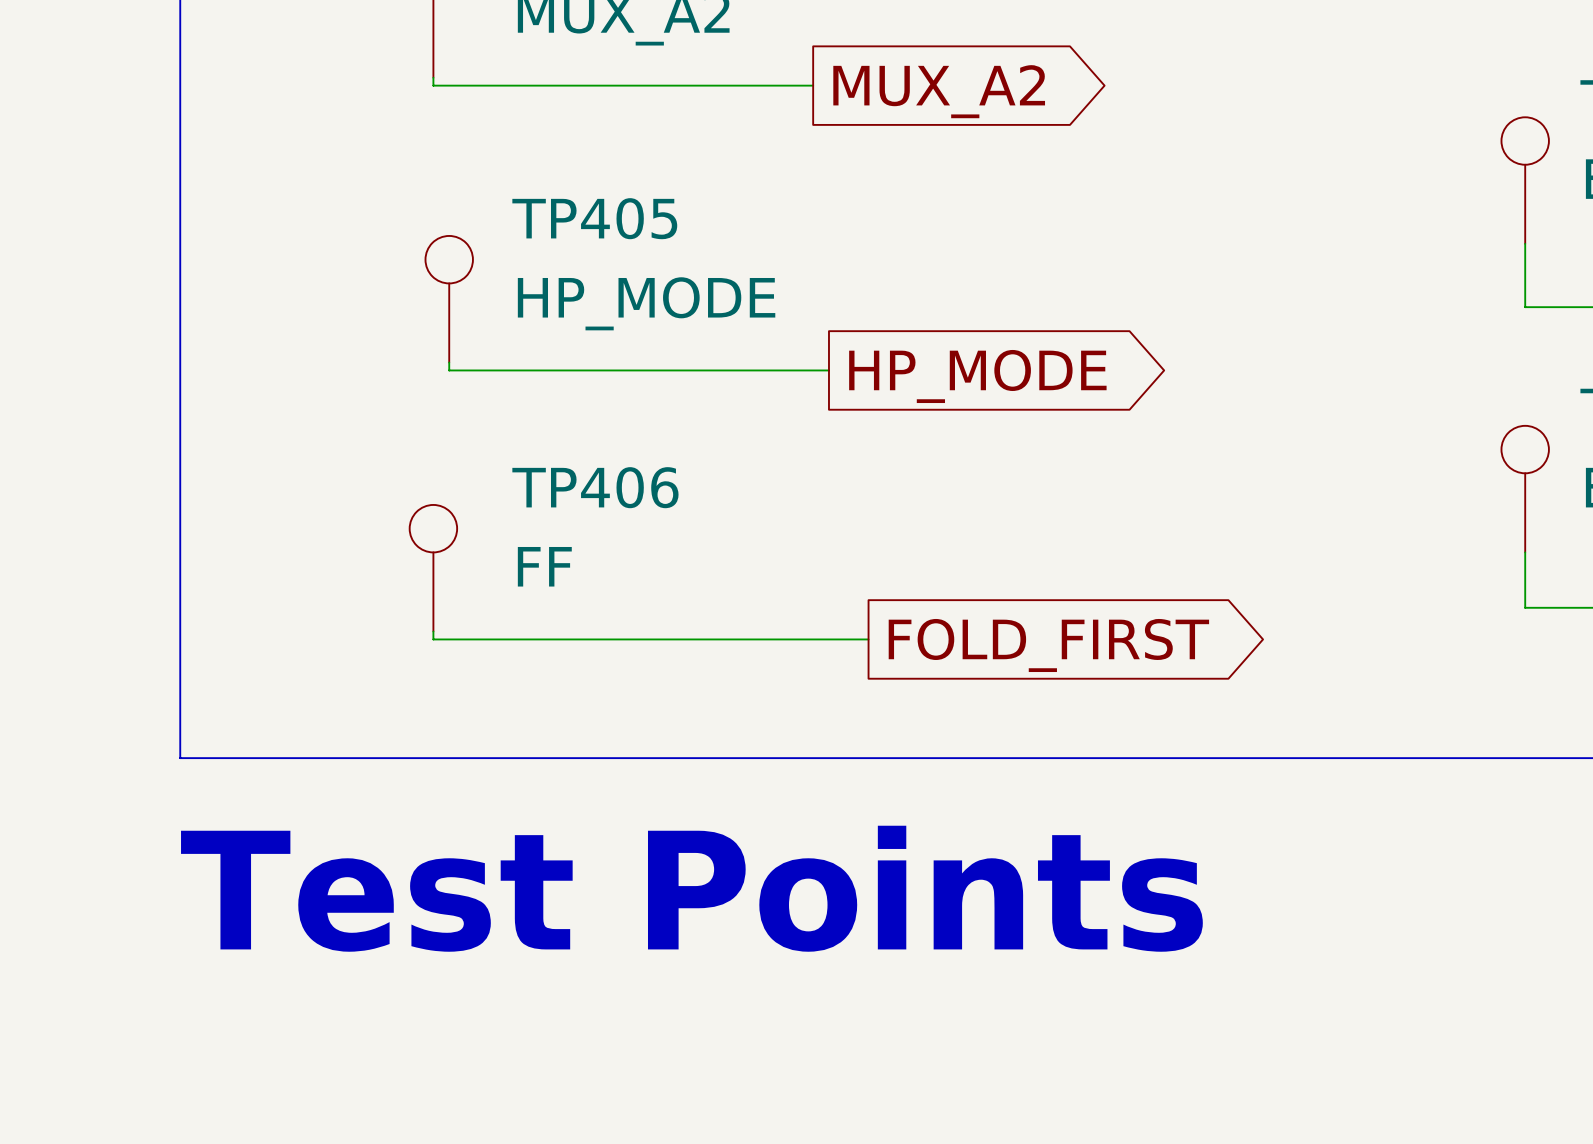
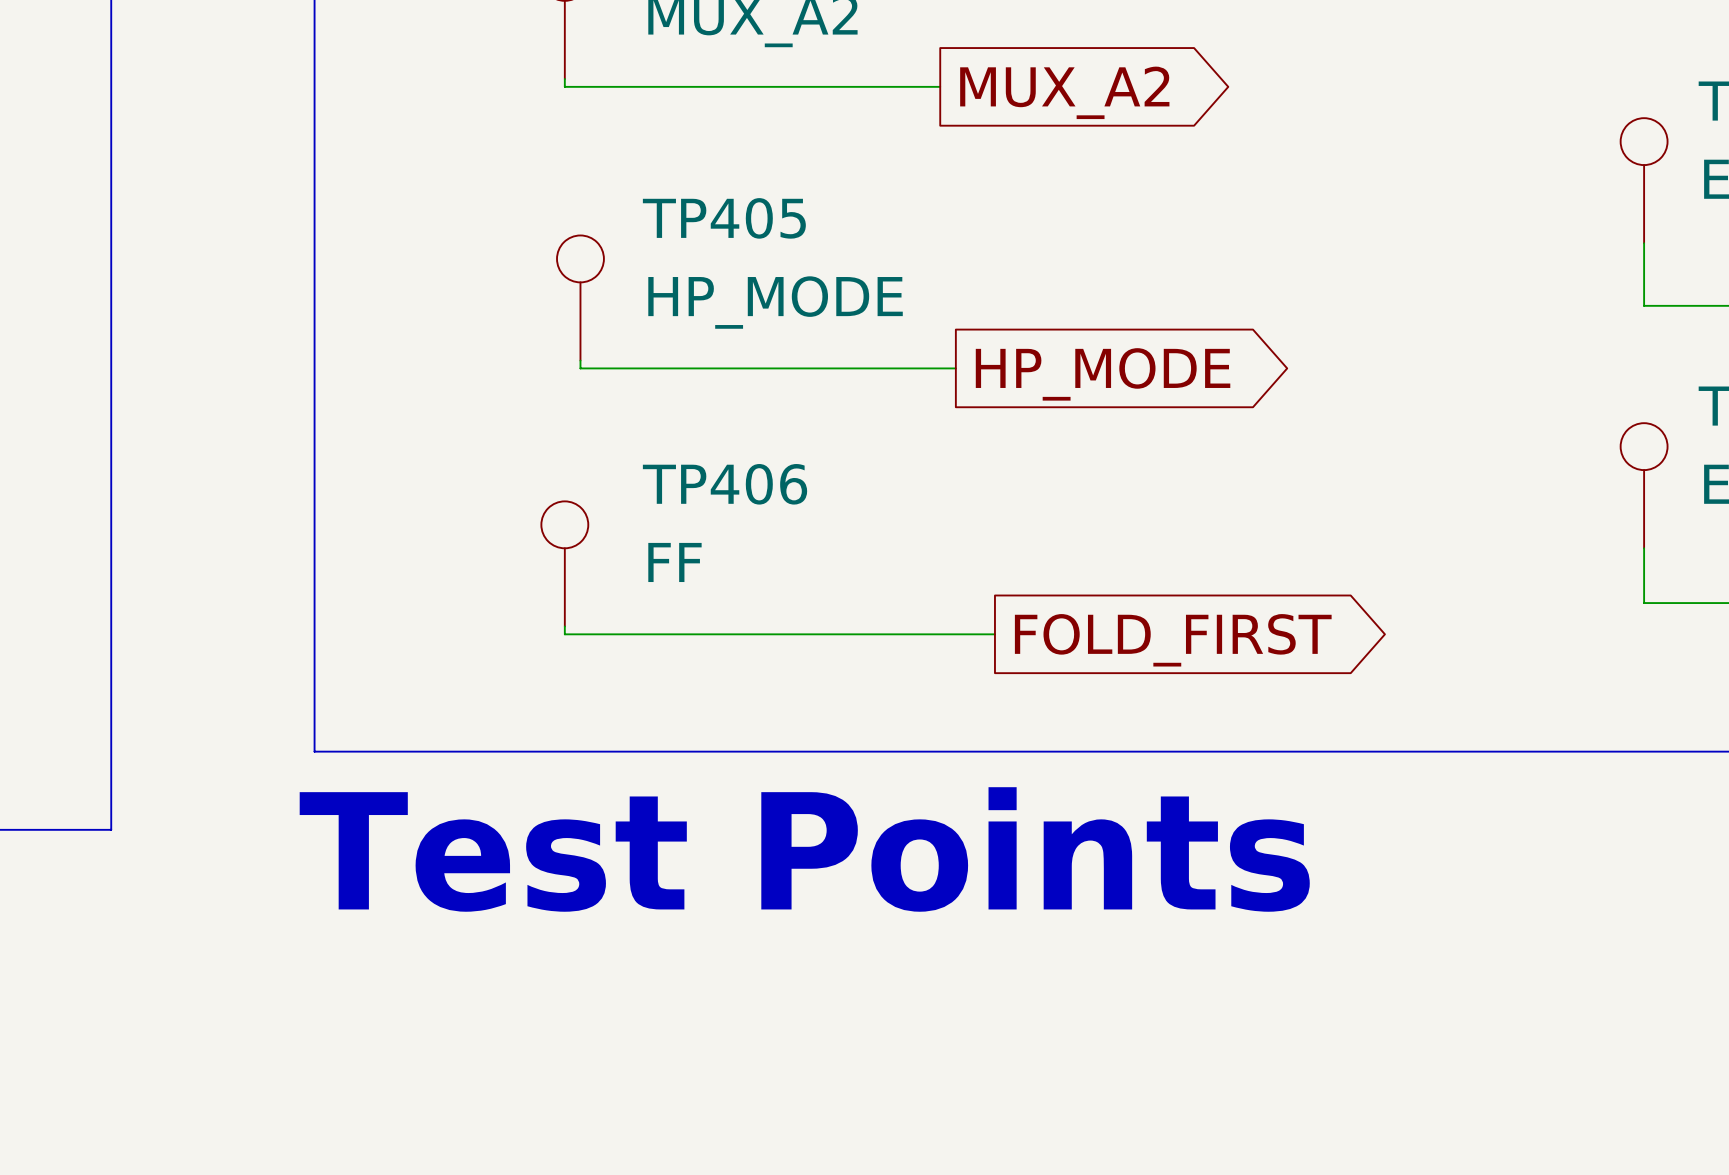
text position: Test Points (691, 888) -> Test Points (804, 849)

